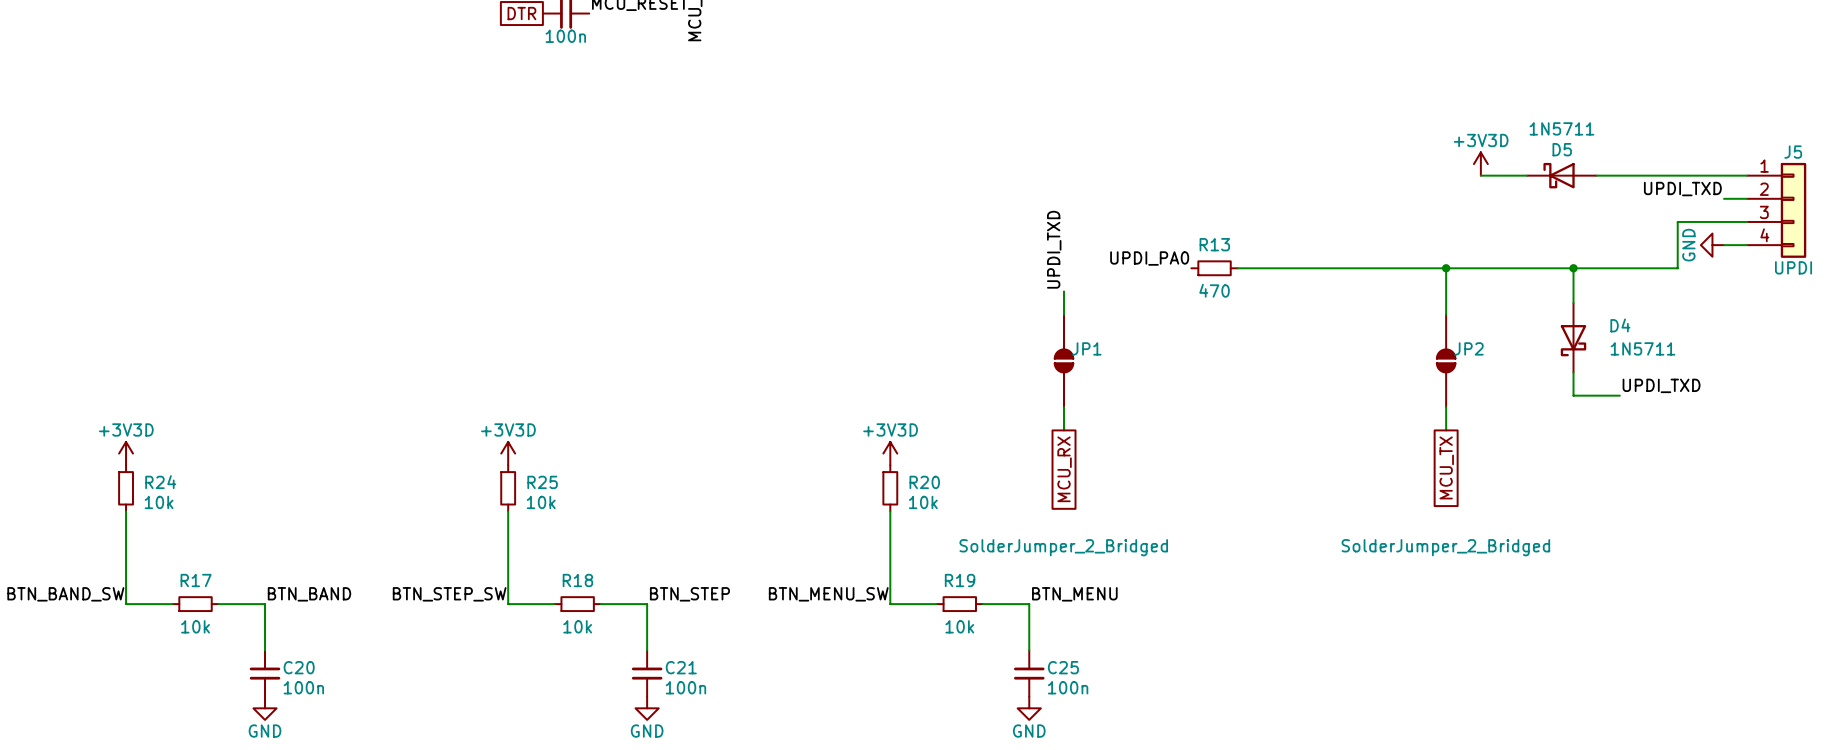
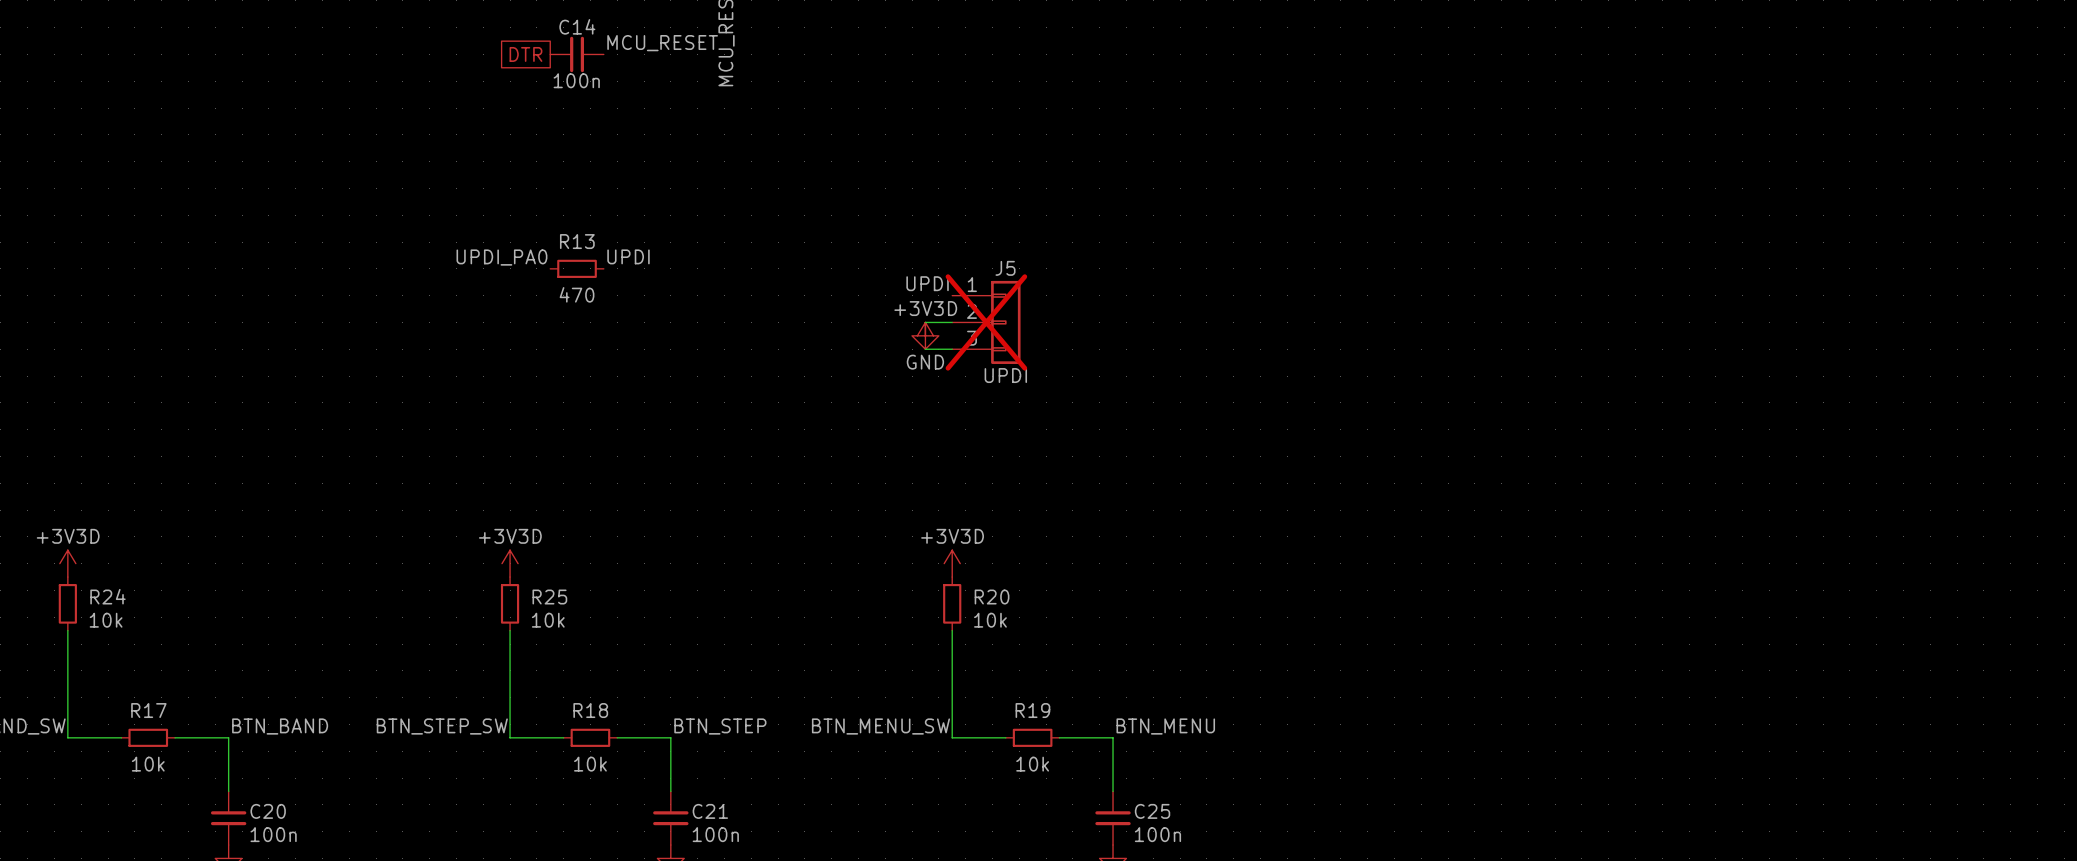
J5 symbol: [1747, 162, 1807, 258] -> [952, 280, 1021, 364]
power symbol: +3V3D (1480, 164) -> none
wire: (1480, 175) (1527, 175) -> none
D5: 1N5711 (1561, 175) -> none
wire: (1596, 175) (1747, 175) -> none
label: none -> UPDI (628, 256)
label: none -> UPDI_PA0 (501, 257)
label: UPDI_TXD (1682, 189) -> none
wire: (1724, 198) (1747, 198) -> none
label: none -> UPDI (927, 283)
wire: (1747, 221) (1677, 221) (1677, 268) (1237, 268) -> none
wire: none -> (925, 322) (952, 322)
J5 do-not-place cross: none -> (986, 322)
power symbol: GND (1712, 245) -> none
wire: (1724, 245) (1747, 245) -> none
label: UPDI_TXD (1054, 249) -> none
power symbol: none -> GND (925, 335)
power symbol: none -> +3V3D (925, 335)
label: UPDI_PA0 (1149, 258) -> none
wire: none -> (925, 349) (952, 349)
R13 position: (1214, 268) -> (577, 268)
wire: (1446, 268) (1446, 314) -> none
junction: (1446, 268) -> none
wire: (1573, 268) (1573, 303) -> none
junction: (1573, 268) -> none
wire: (1064, 291) (1064, 314) -> none
D4: 1N5711 (1573, 337) -> none
JP1: SolderJumper_2_Bridged (1064, 360) -> none
JP2: SolderJumper_2_Bridged (1446, 360) -> none
wire: (1573, 372) (1573, 395) (1619, 395) -> none
label: UPDI_TXD (1661, 385) -> none
wire: (1064, 407) (1064, 430) -> none
wire: (1446, 407) (1446, 430) -> none
global label: MCU_TX (1446, 467) -> none
global label: MCU_RX (1064, 469) -> none

